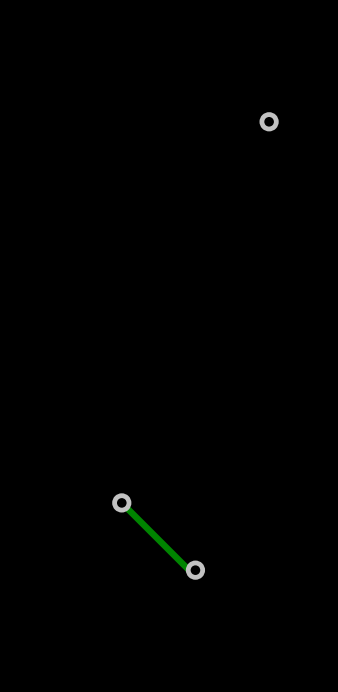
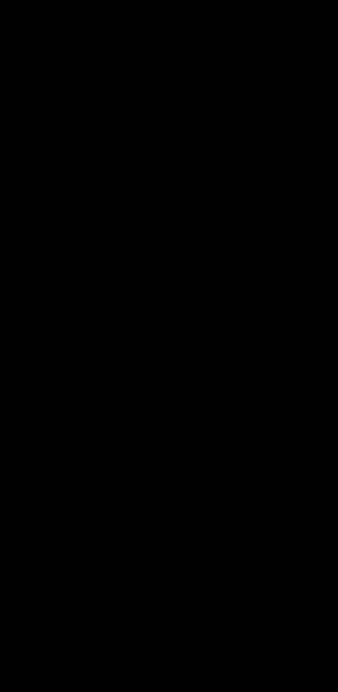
via: (269, 121) -> none
track: (121, 502) (189, 570) (195, 570) -> none
via: (121, 502) -> none
via: (195, 570) -> none

